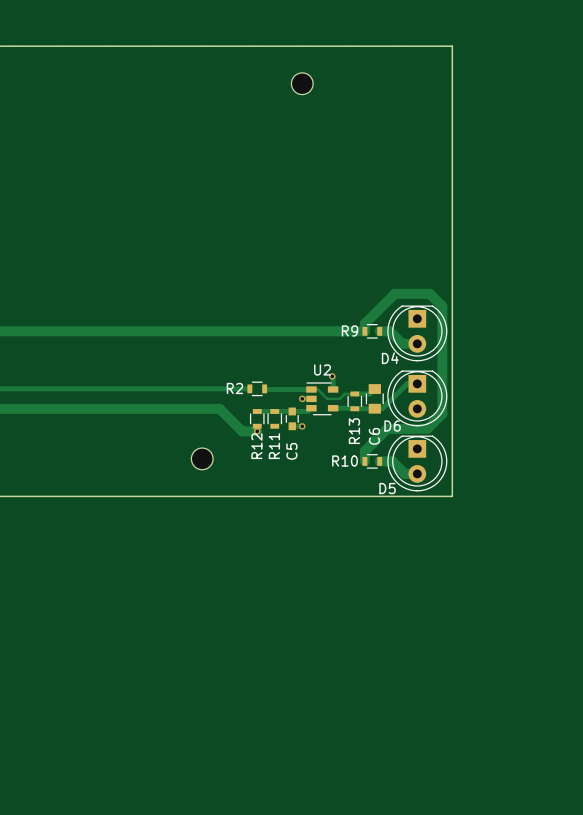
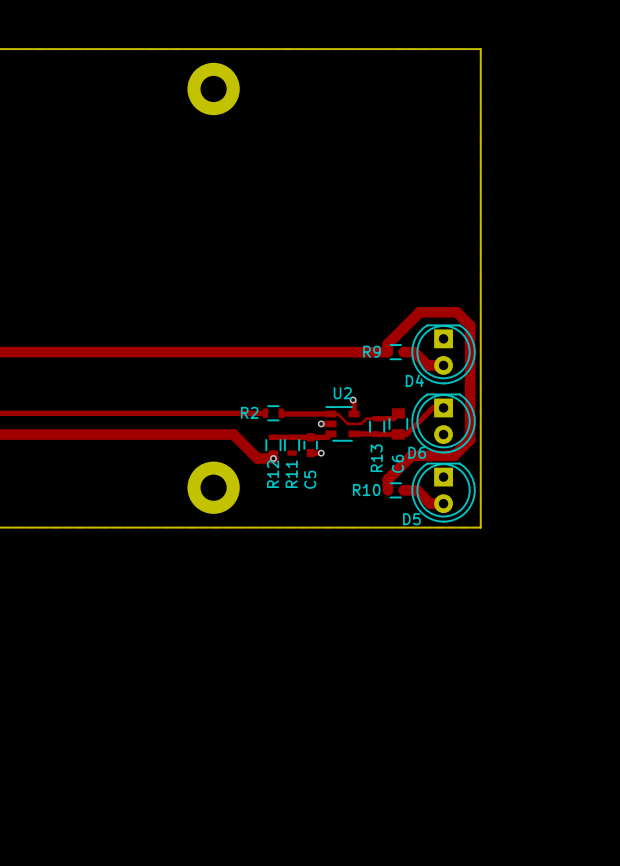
part: none -> (213, 88)
part: (302, 83) -> none
part footprint: [191, 448, 214, 470] -> [187, 461, 240, 514]

